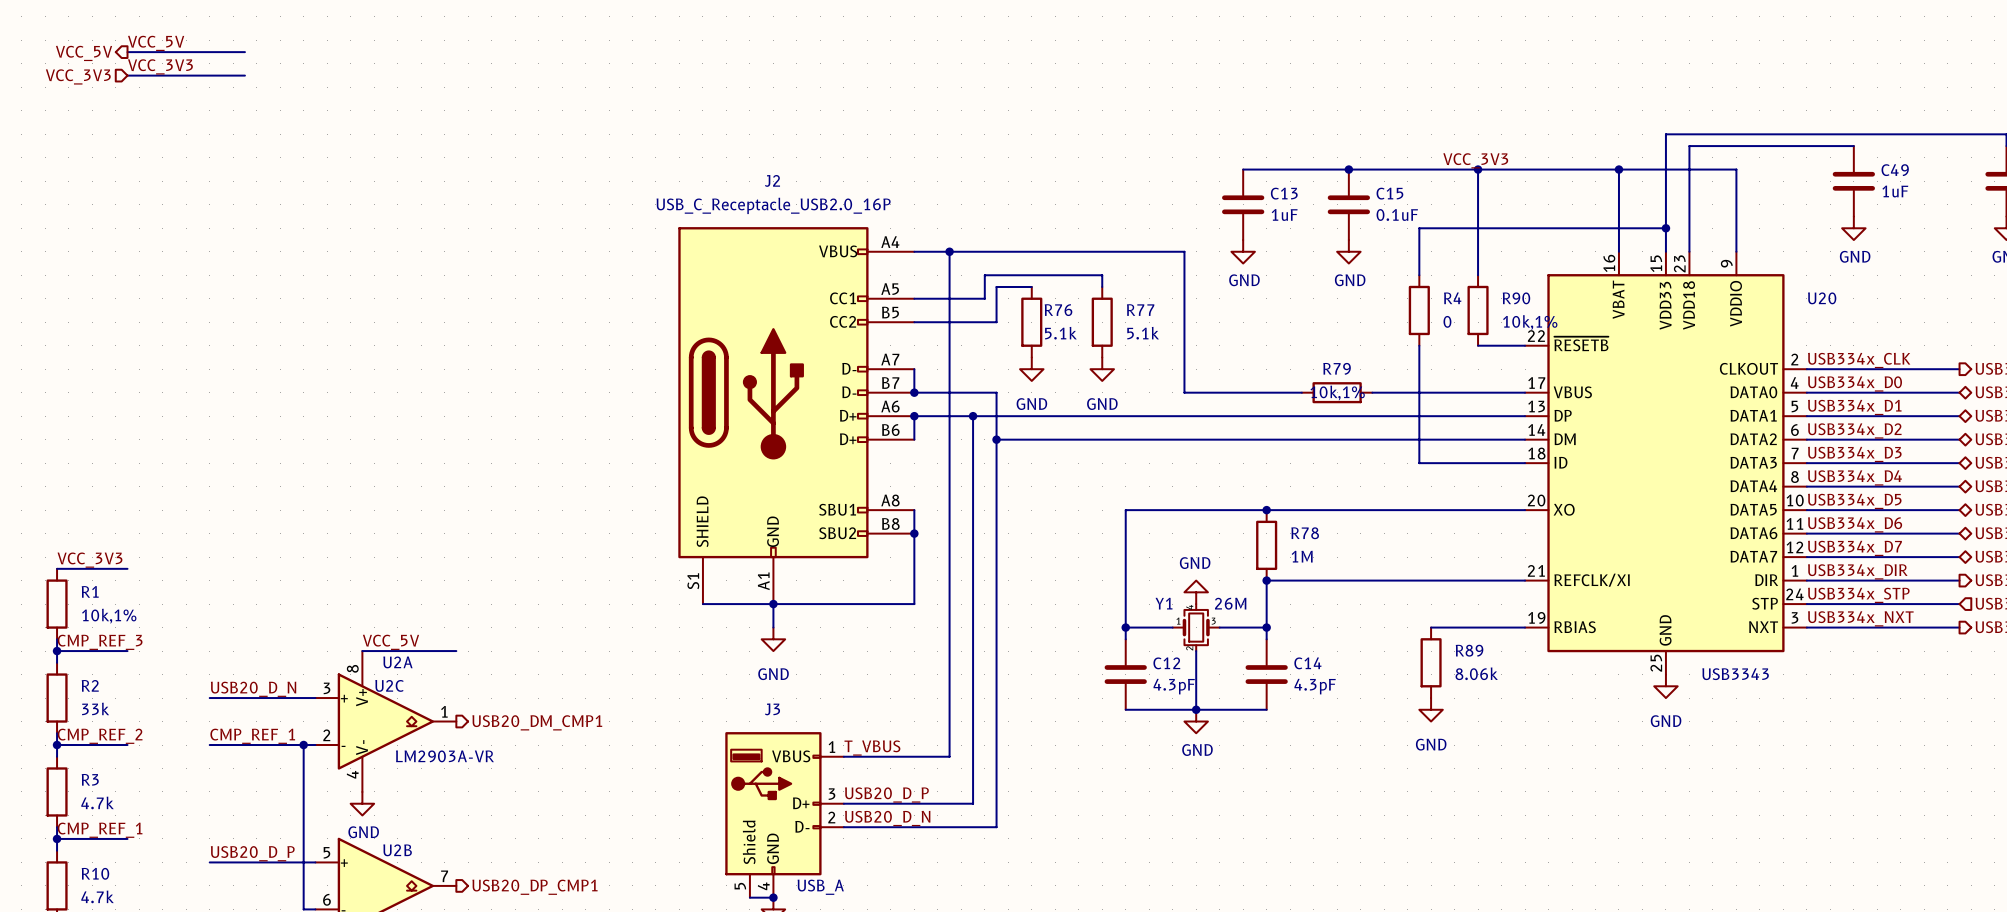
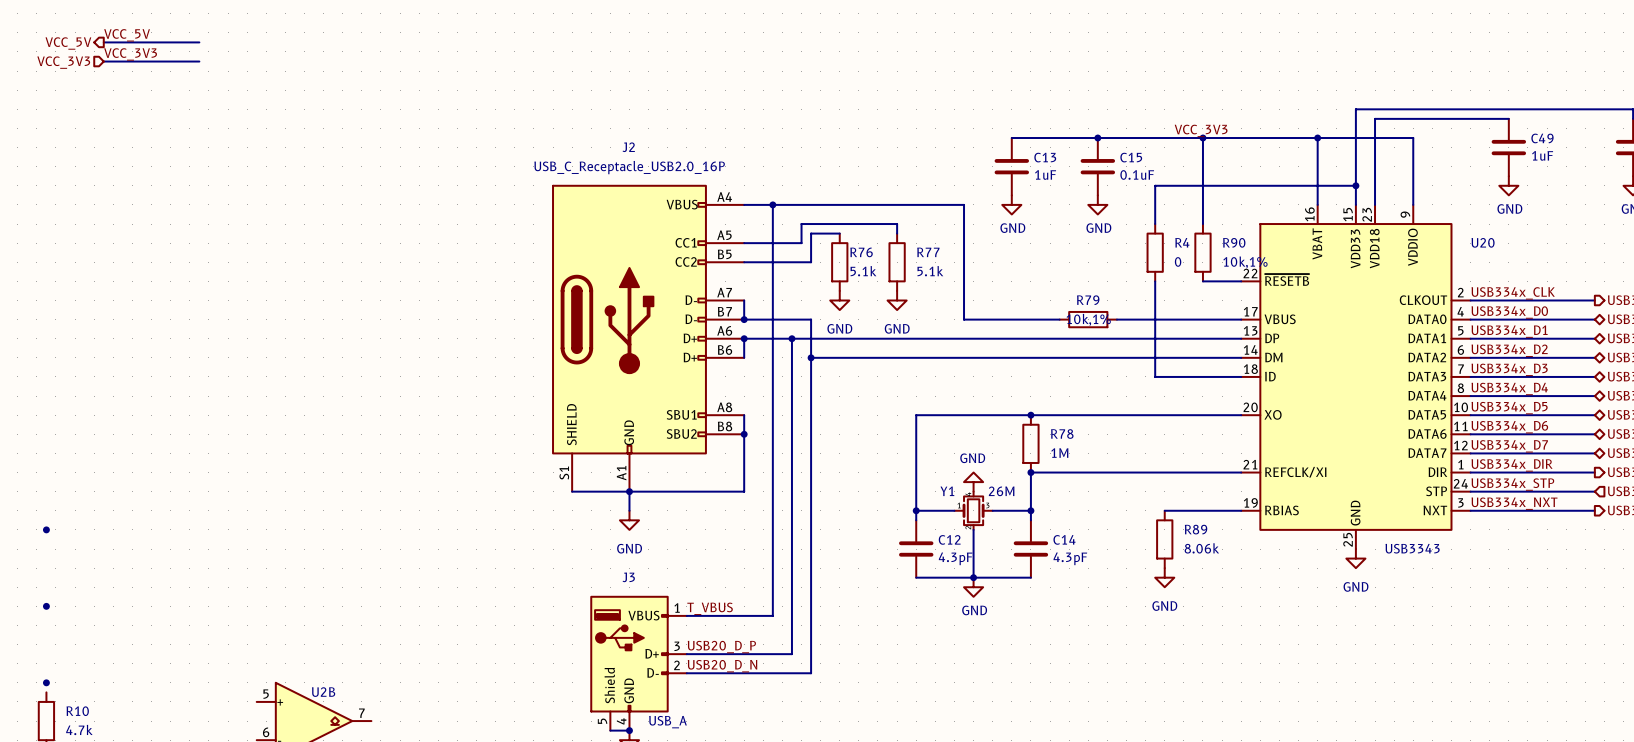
label: VCC_3V3 (89, 560) -> none
wire: (57, 568) (127, 568) -> none
R1: 10k,1% (57, 604) -> none
wire: (57, 639) (57, 662) -> none
label: CMP_REF_3 (100, 642) -> none
label: VCC_5V (391, 642) -> none
wire: (57, 651) (127, 651) -> none
wire: (362, 651) (456, 651) -> none
label: USB20_D_N (253, 689) -> none
R2: 33k (57, 698) -> none
wire: (209, 698) (315, 698) -> none
U2C: (362, 721) -> none
U2A: LM2903A-VR (385, 721) -> none
hierarchical label: USB20_DM_CMP1 (537, 722) -> none
wire: (57, 733) (57, 756) -> none
label: CMP_REF_2 (100, 736) -> none
label: CMP_REF_1 (252, 736) -> none
wire: (57, 745) (127, 745) -> none
wire: (209, 745) (315, 745) -> none
wire: (303, 745) (303, 909) (315, 909) -> none
junction: (303, 745) -> none
R3: 4.7k (57, 791) -> none
power symbol: GND (362, 803) -> none
wire: (57, 827) (57, 850) -> none
label: CMP_REF_1 (100, 830) -> none
wire: (57, 838) (127, 838) -> none
label: USB20_D_P (252, 853) -> none
wire: (209, 862) (315, 862) -> none
hierarchical label: USB20_DP_CMP1 (534, 887) -> none

